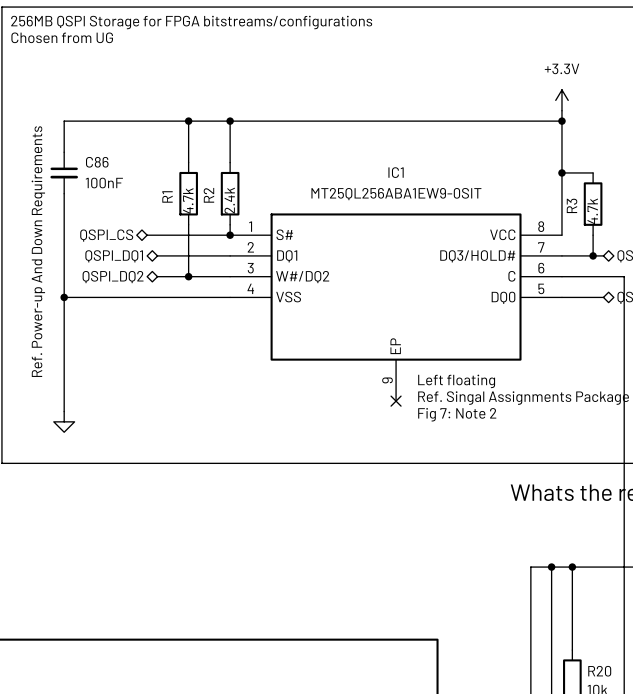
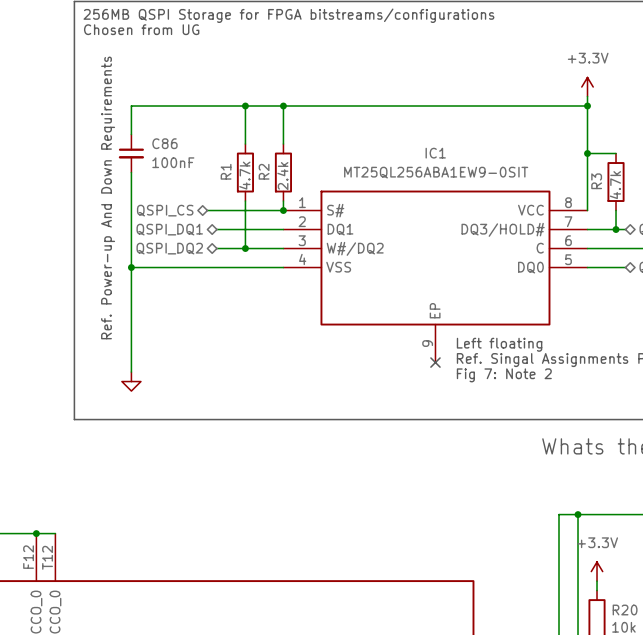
wire: (572, 567) (572, 639) -> none
junction: (572, 567) -> none
power symbol: none -> +3.3V (597, 571)

